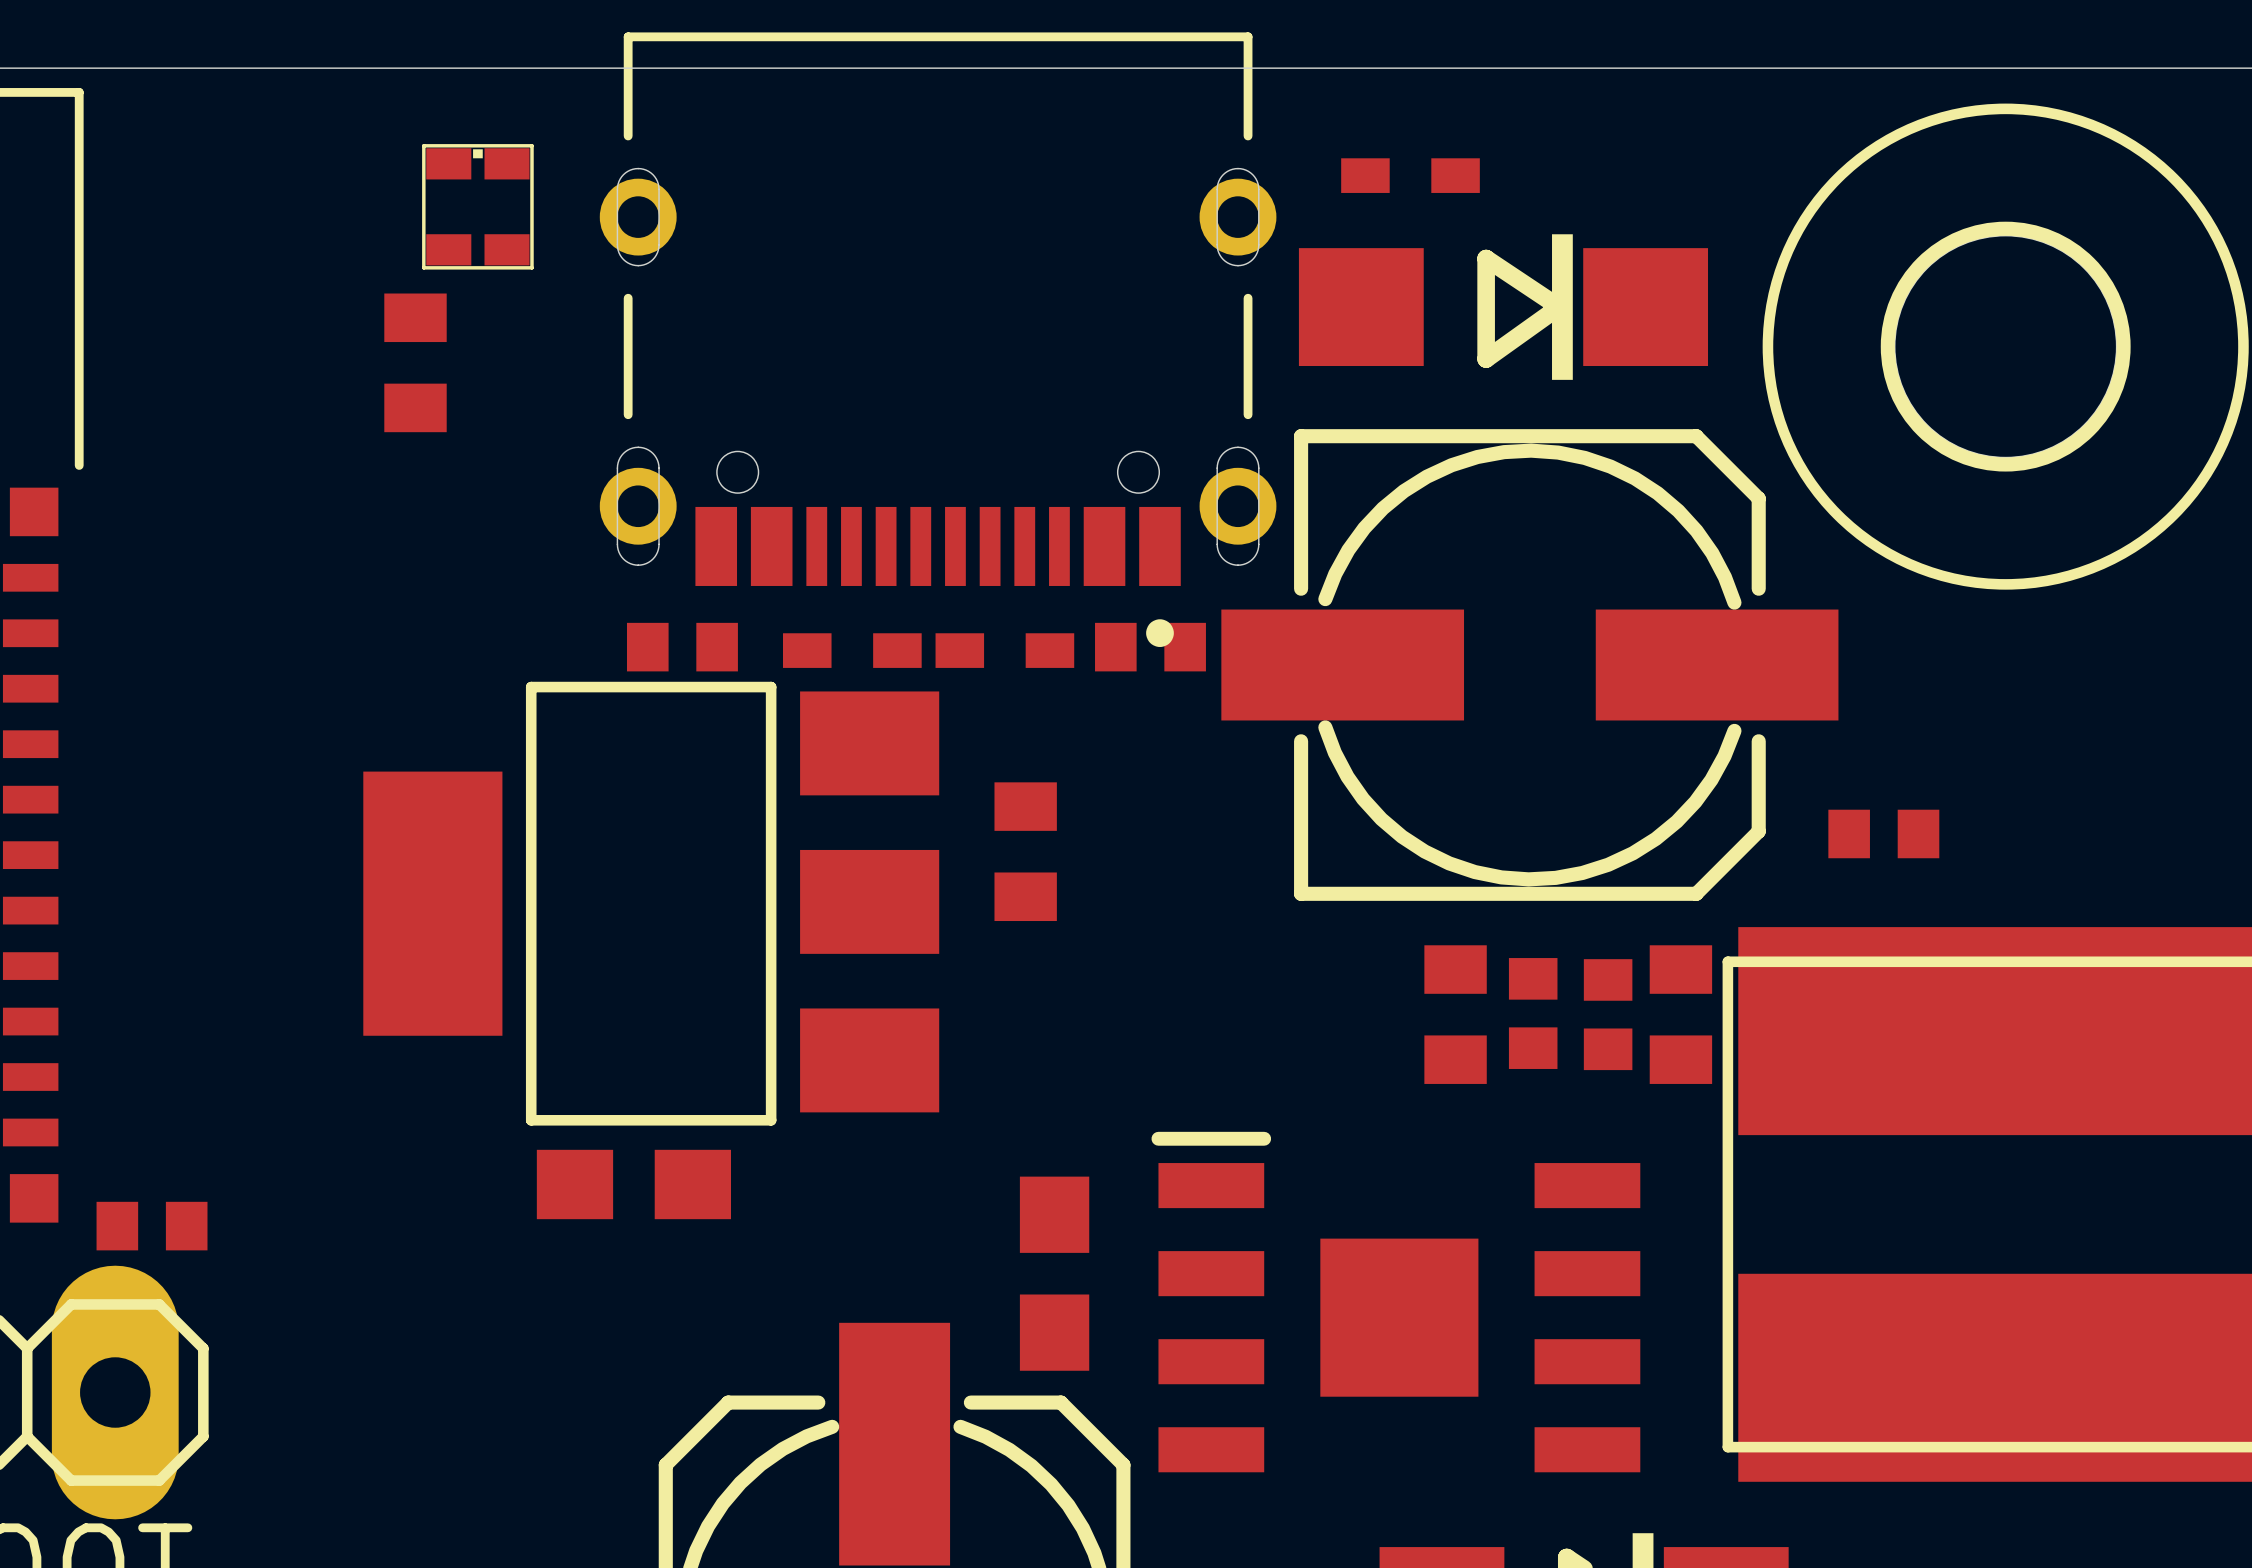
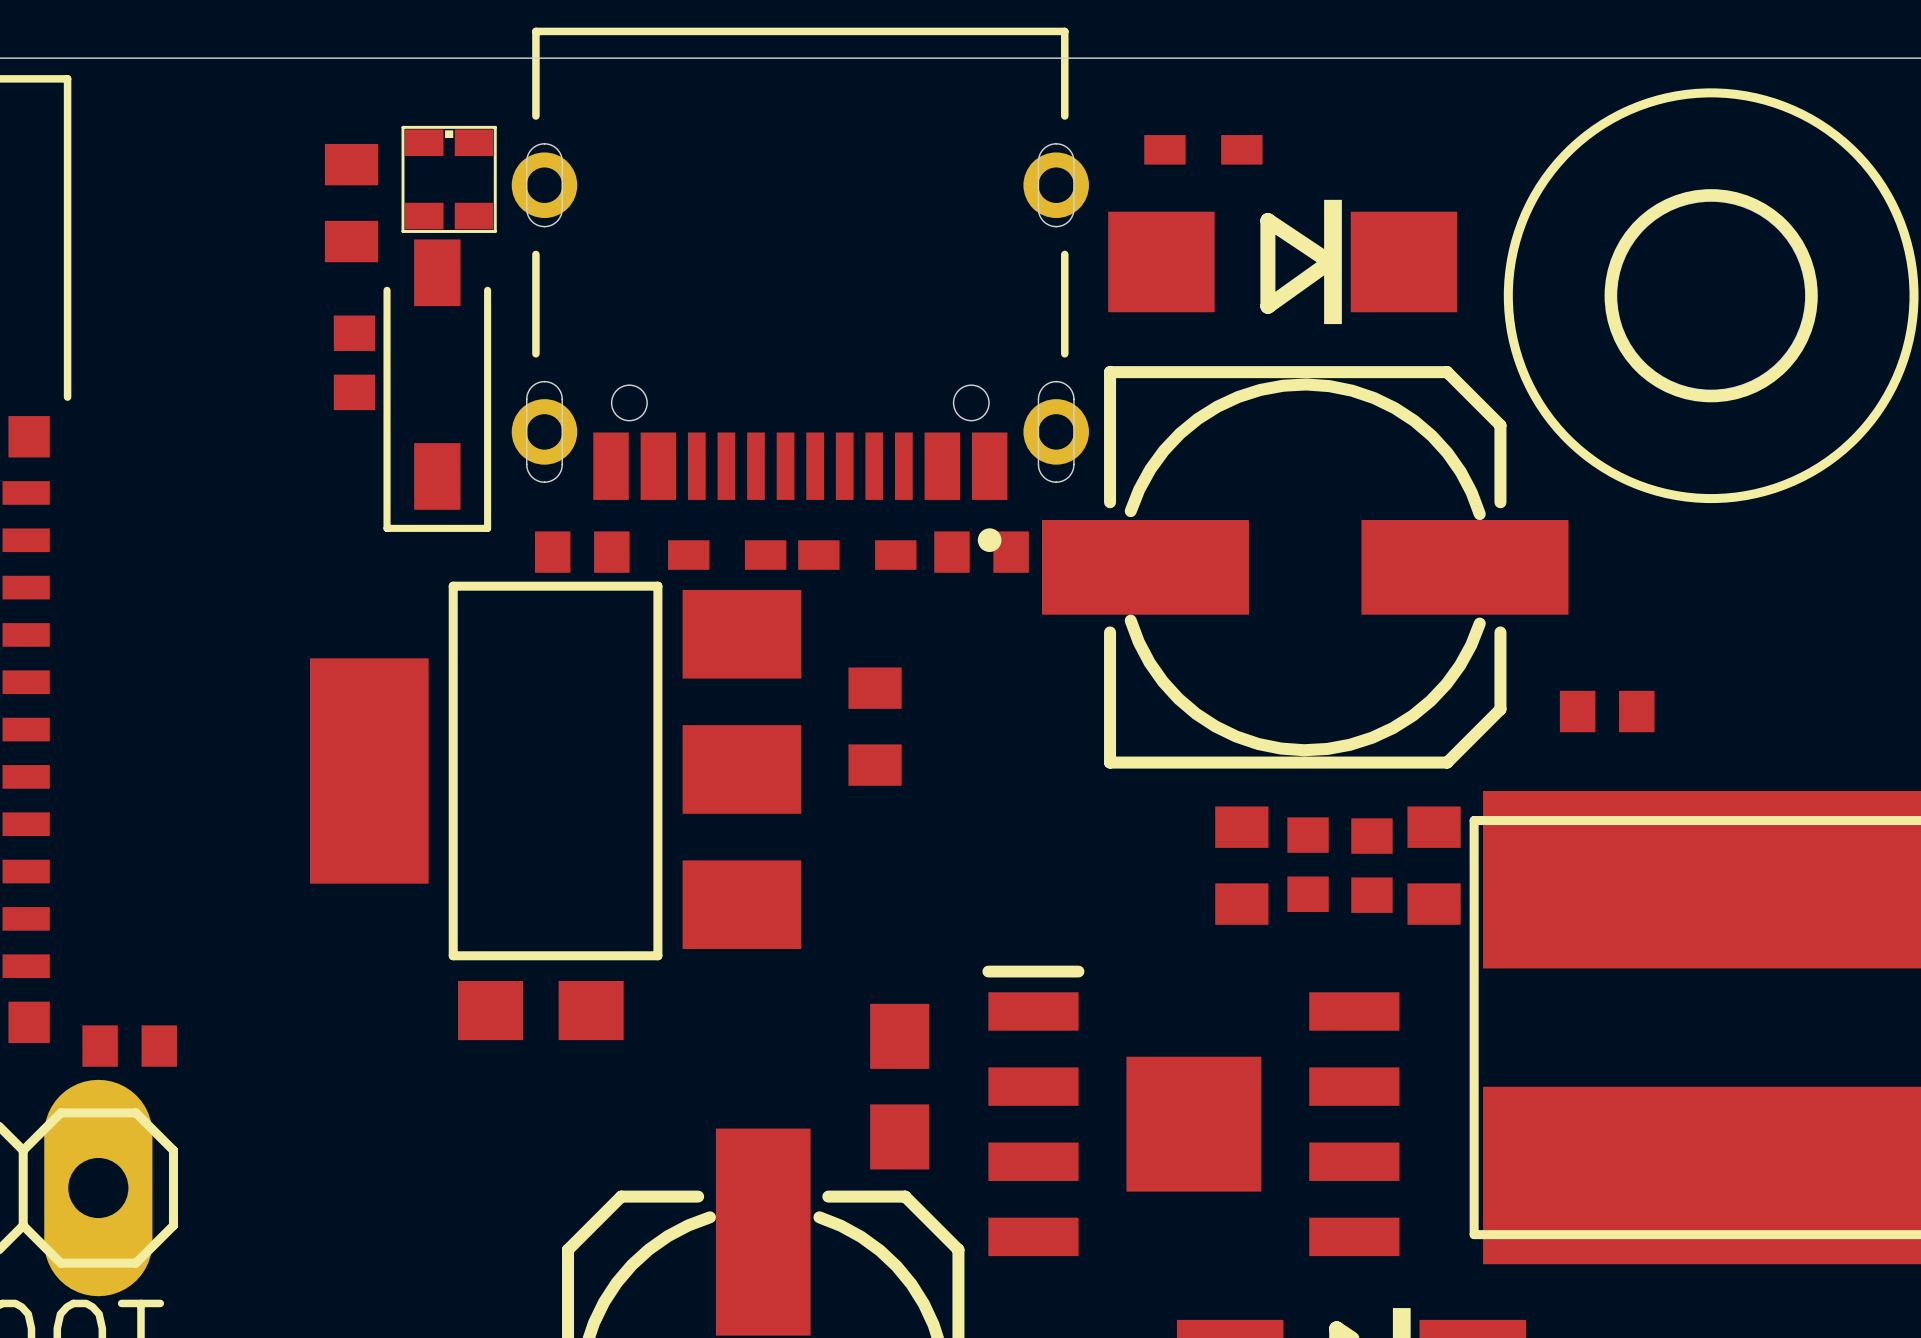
part position: (477, 206) -> (449, 179)
part position: (415, 362) -> (351, 203)
part: none -> (354, 362)
part: none -> (437, 385)

